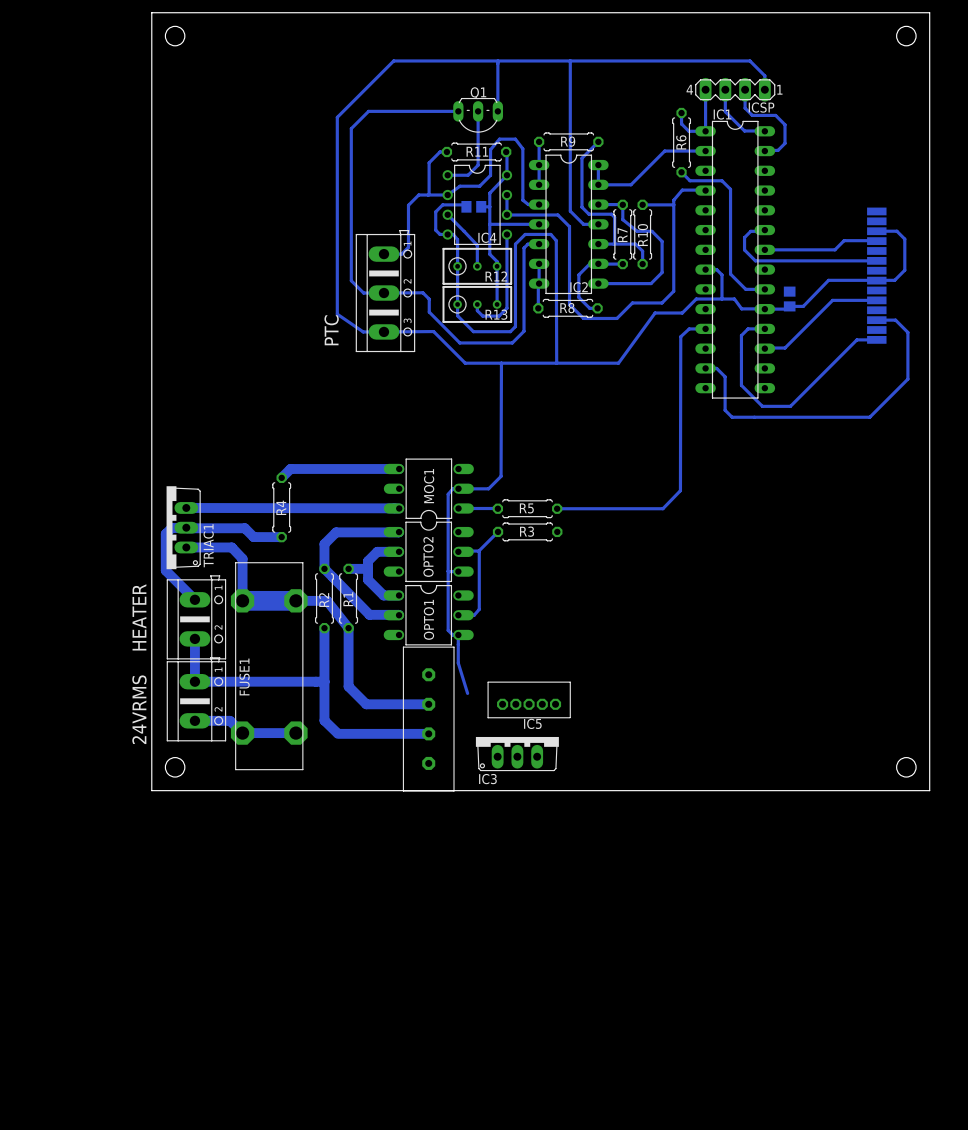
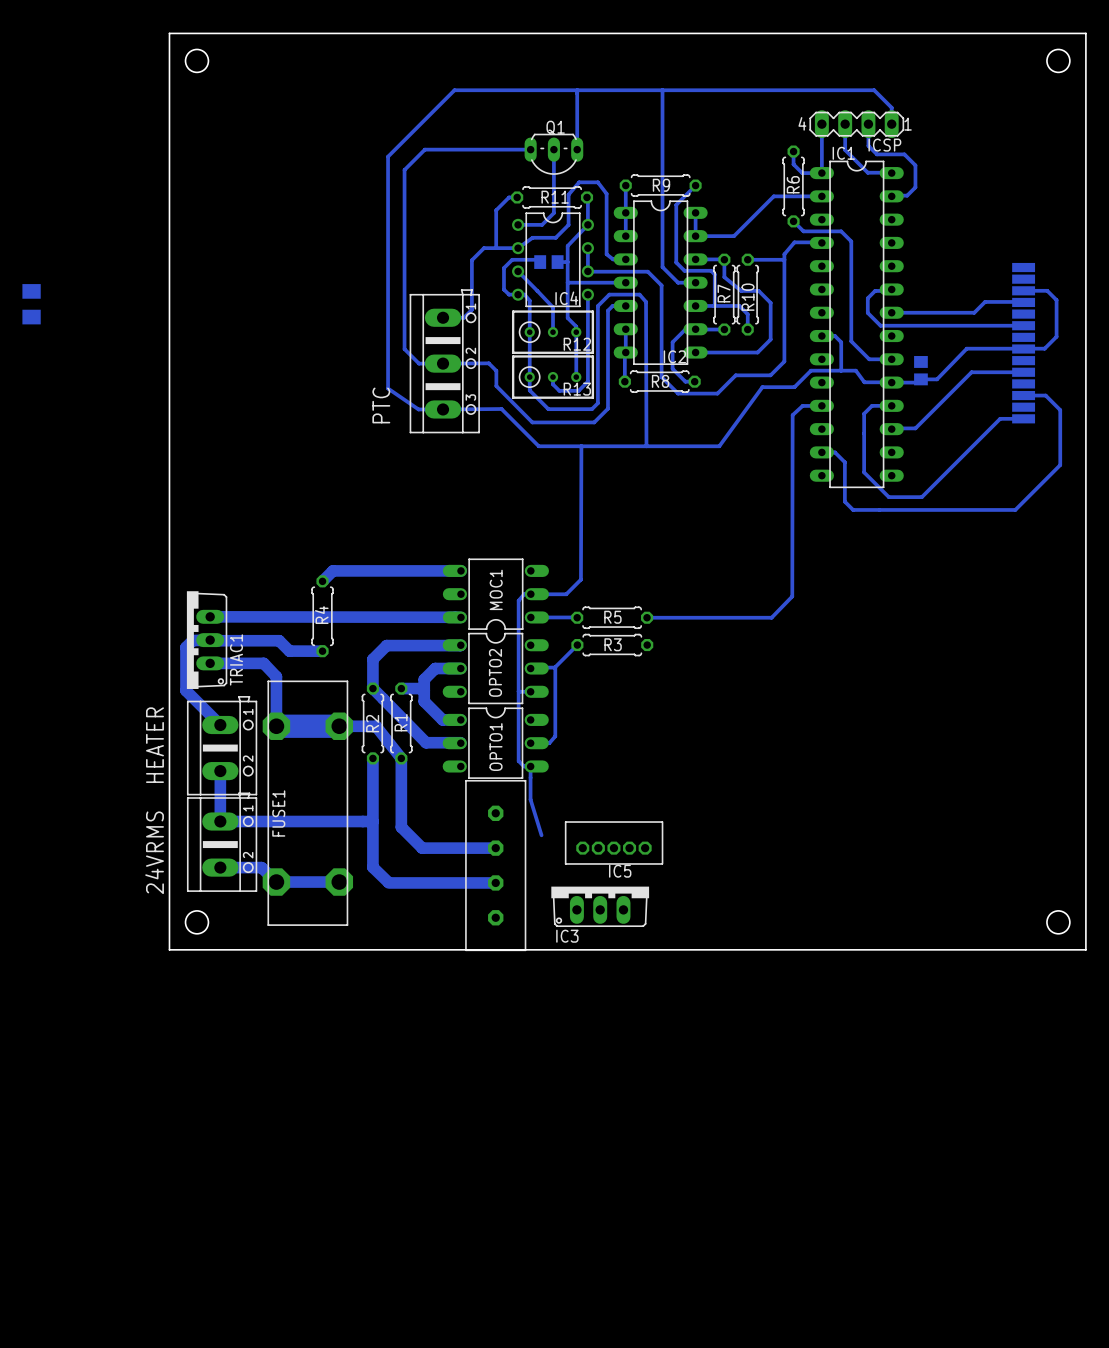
part: none -> (31, 304)

